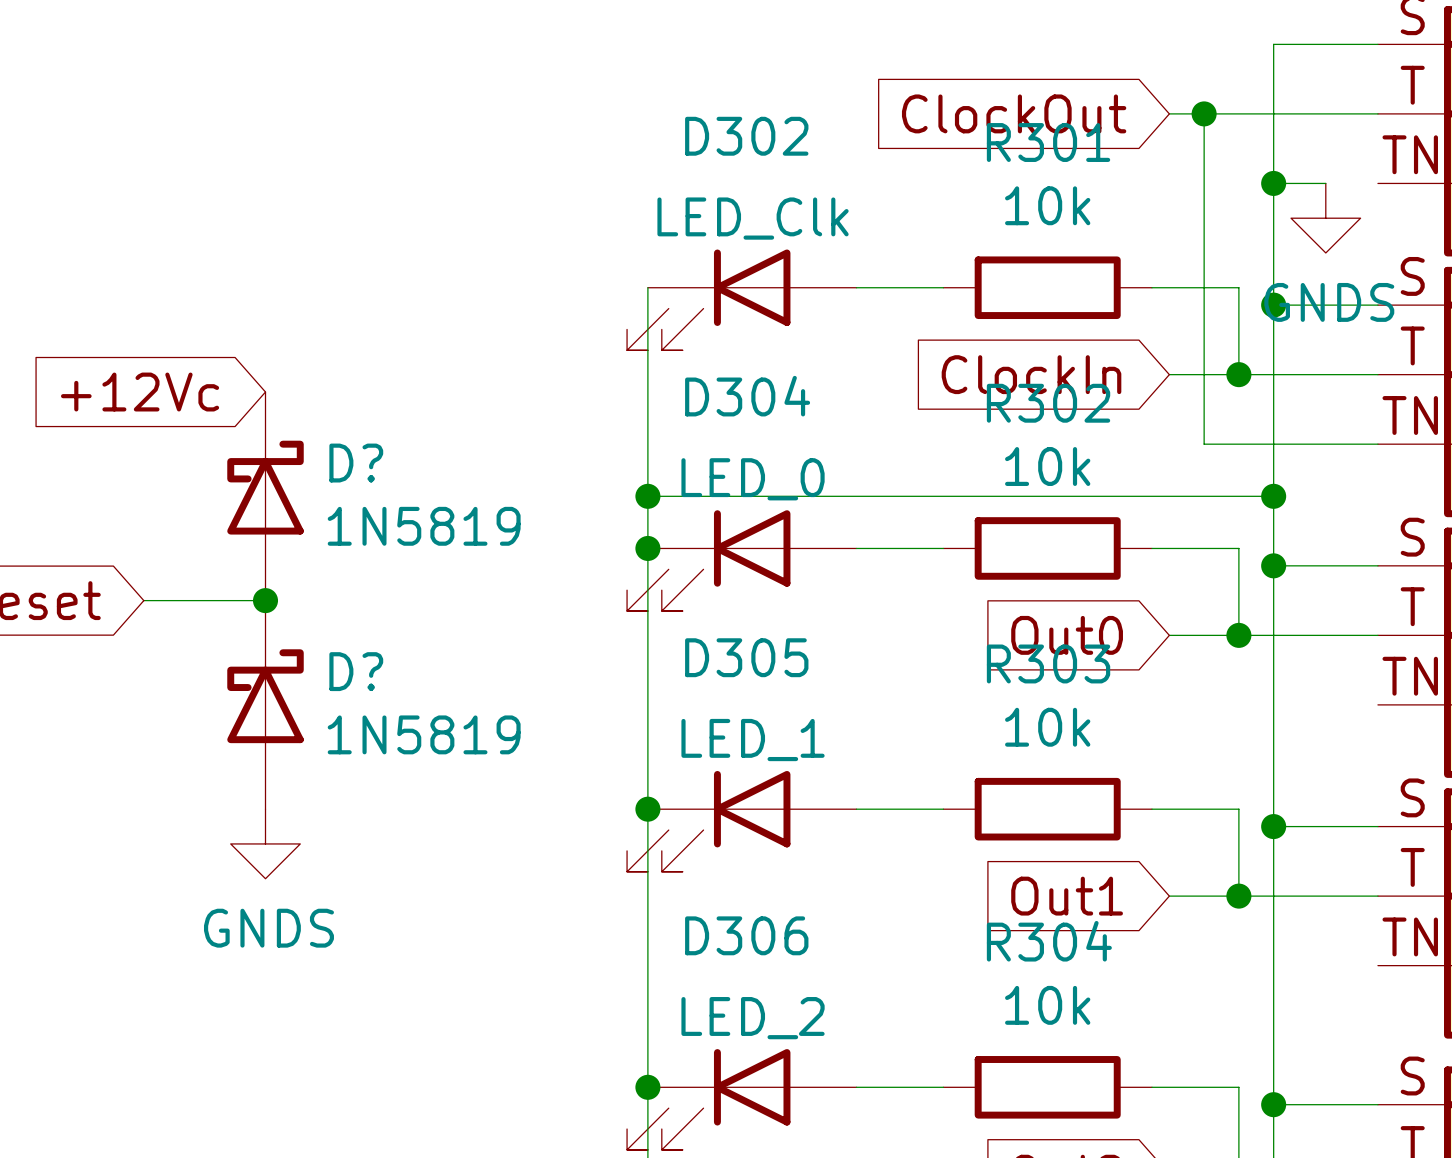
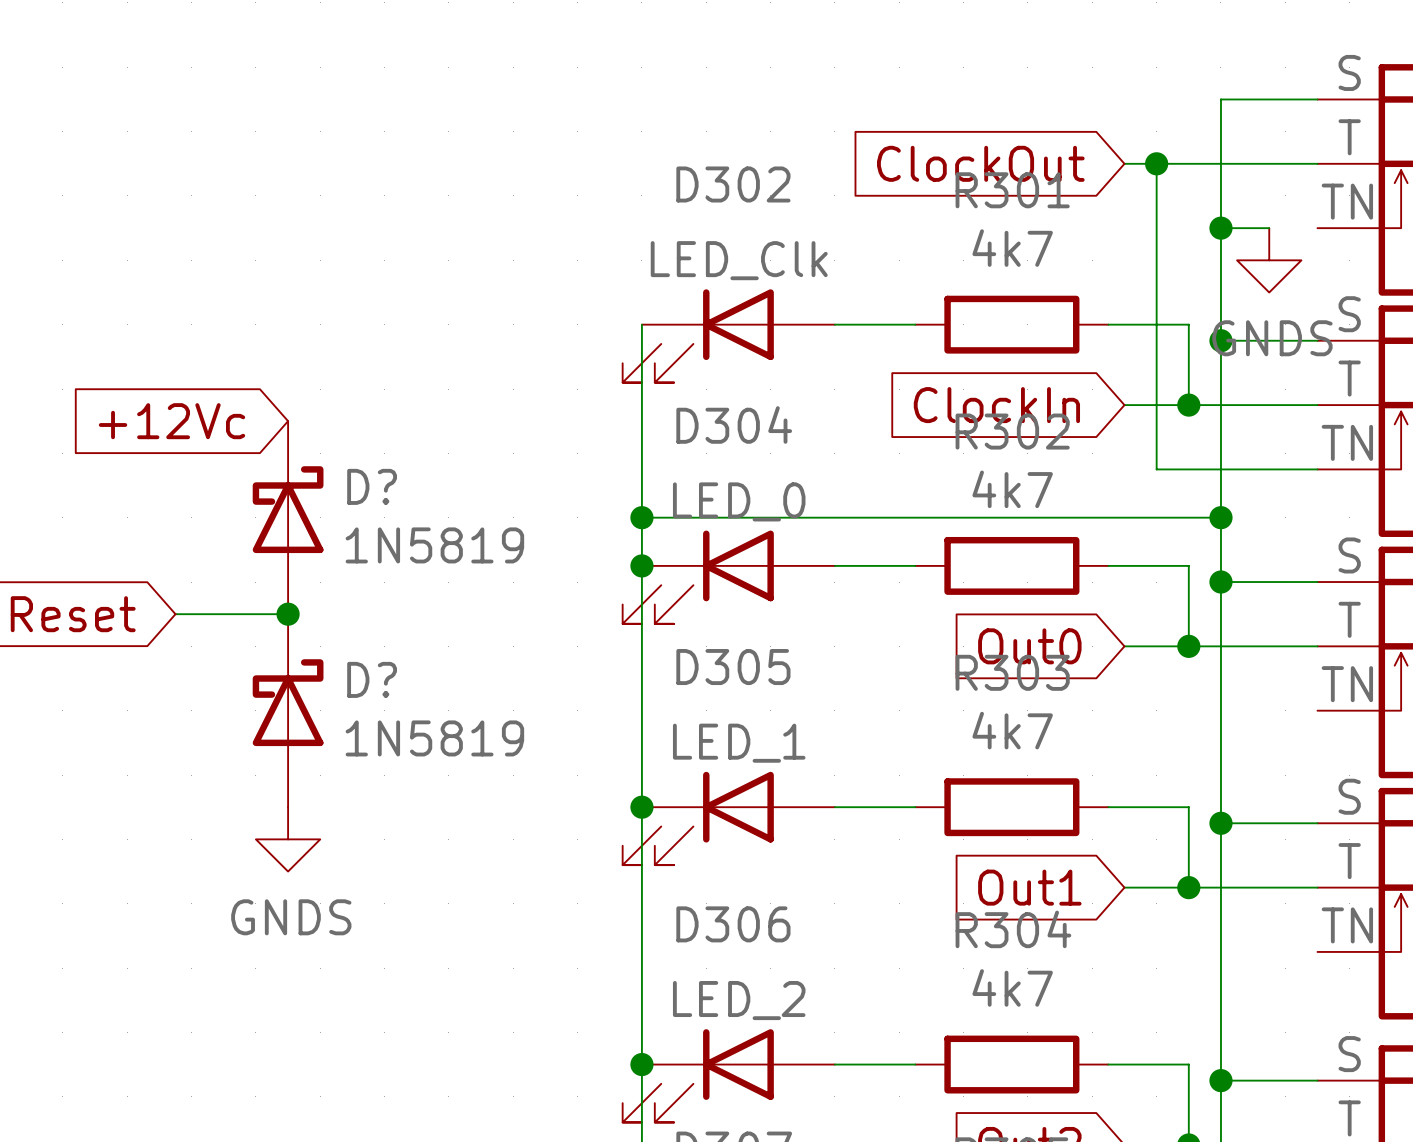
R301 value: 10k (1047, 205) -> 4k7 (1012, 248)
R302 value: 10k (1047, 466) -> 4k7 (1012, 489)
R303 value: 10k (1047, 727) -> 4k7 (1012, 730)
R304 value: 10k (1047, 1005) -> 4k7 (1012, 987)

